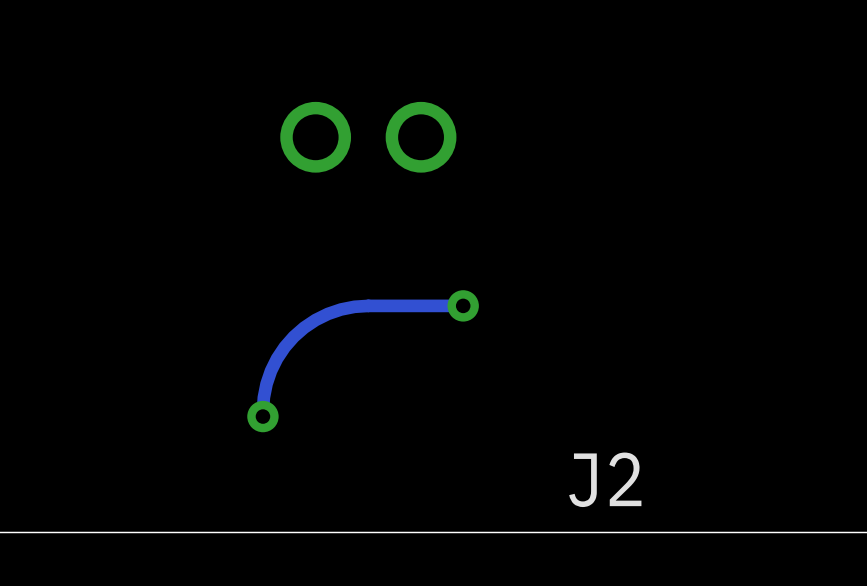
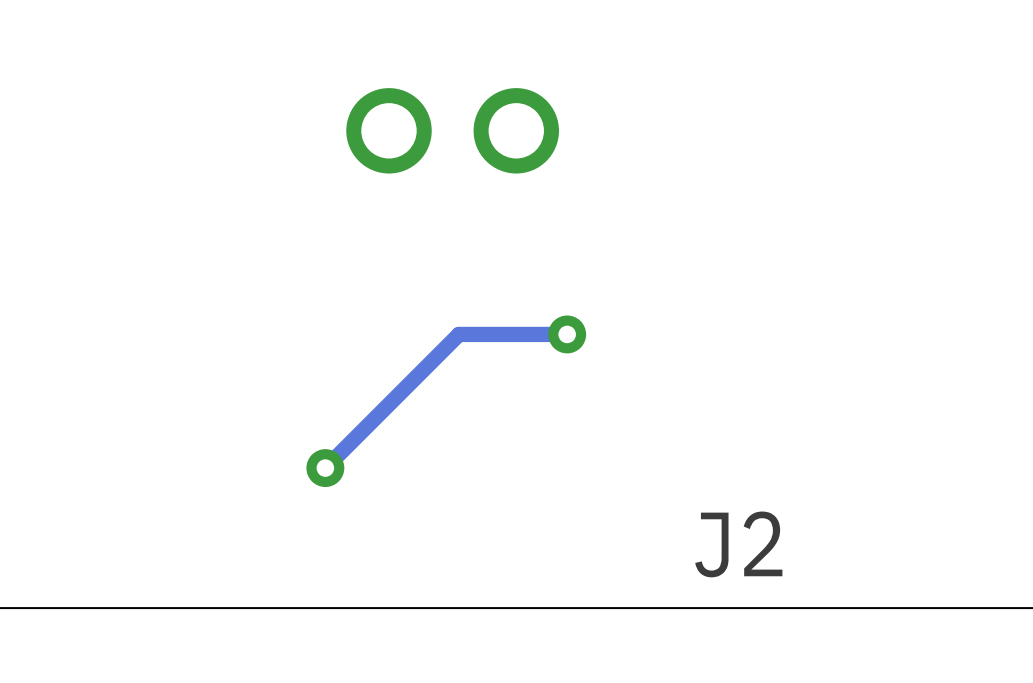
track: (373, 305) (354, 306) (328, 313) (315, 320) (293, 336) (284, 347) (270, 370) (263, 397) (262, 416) -> (459, 334) (325, 468)

